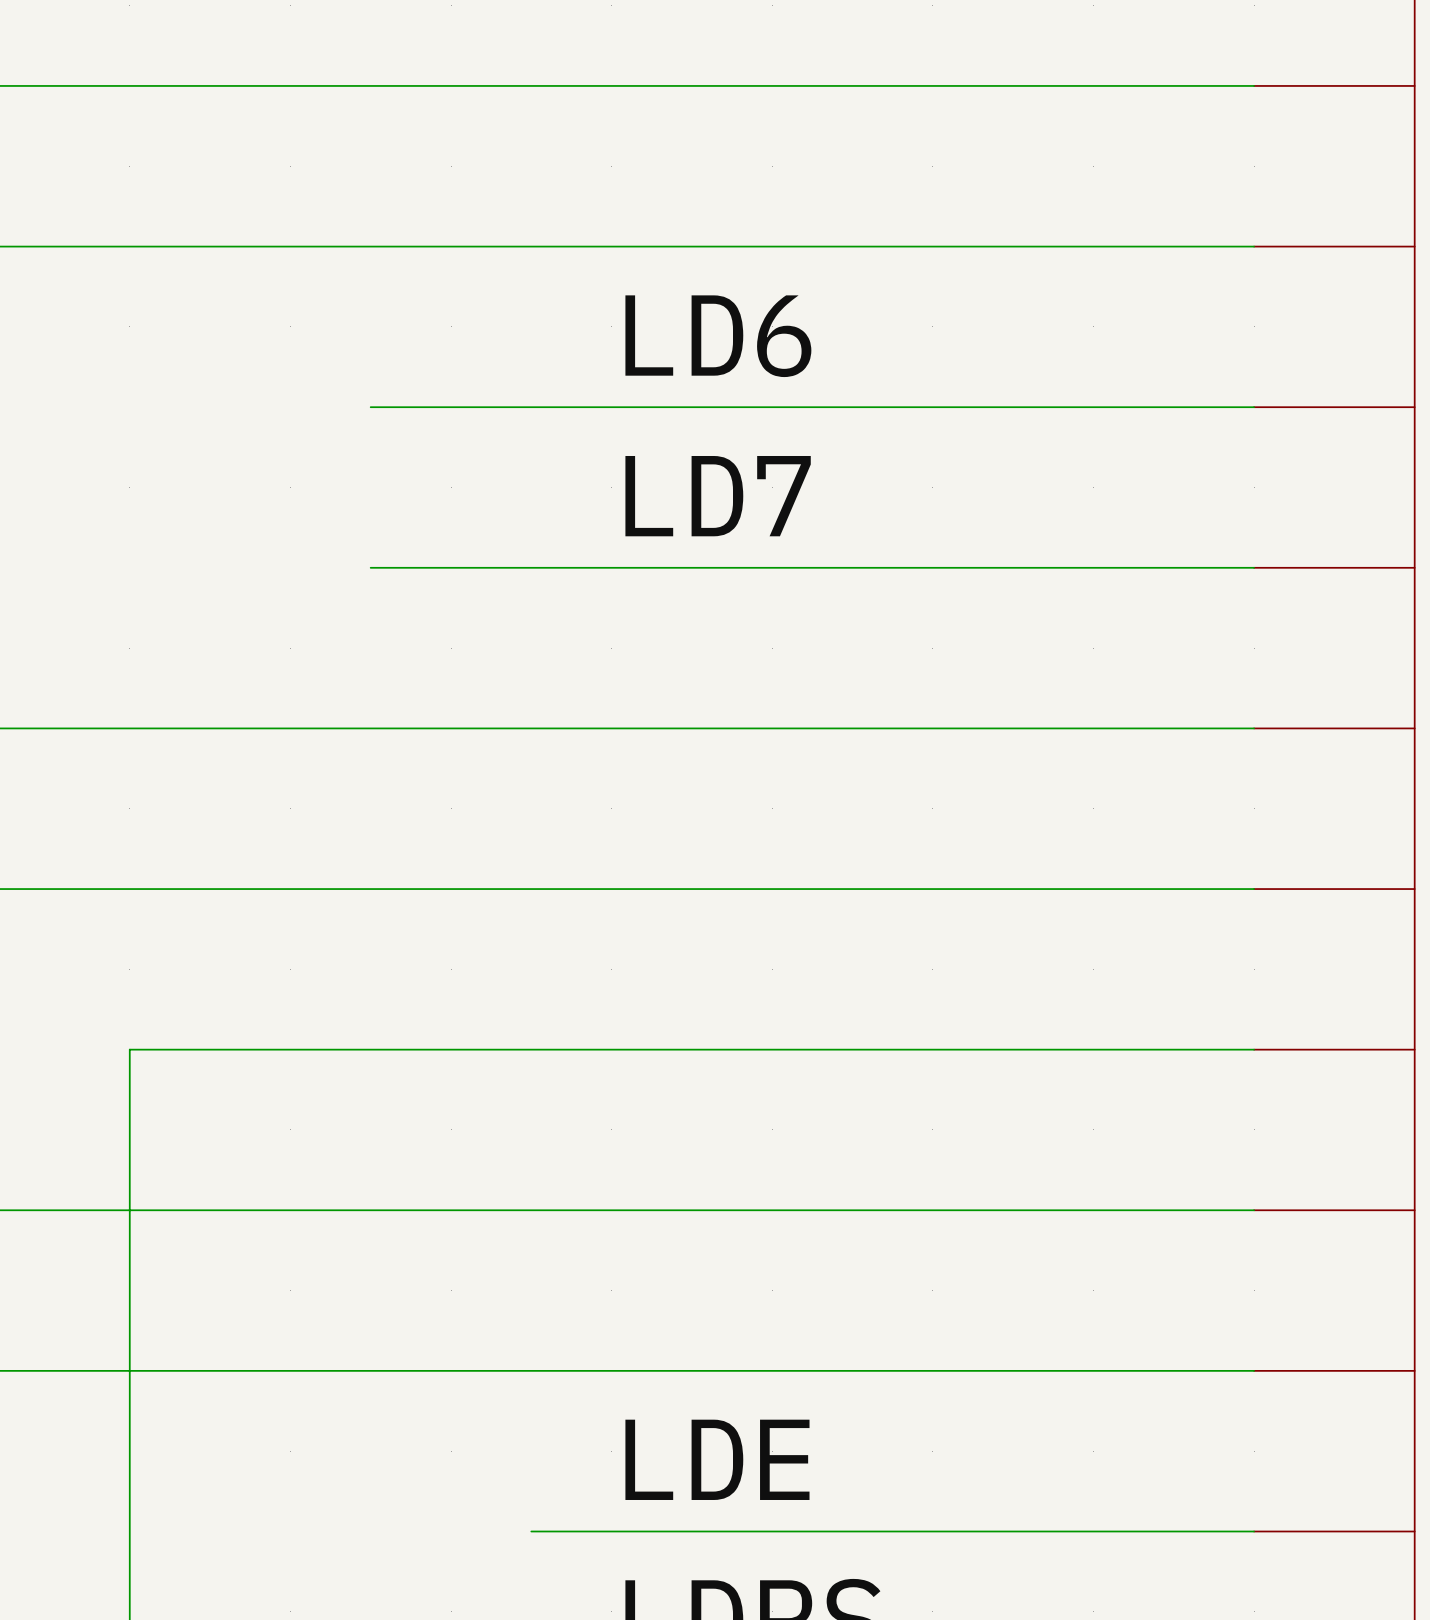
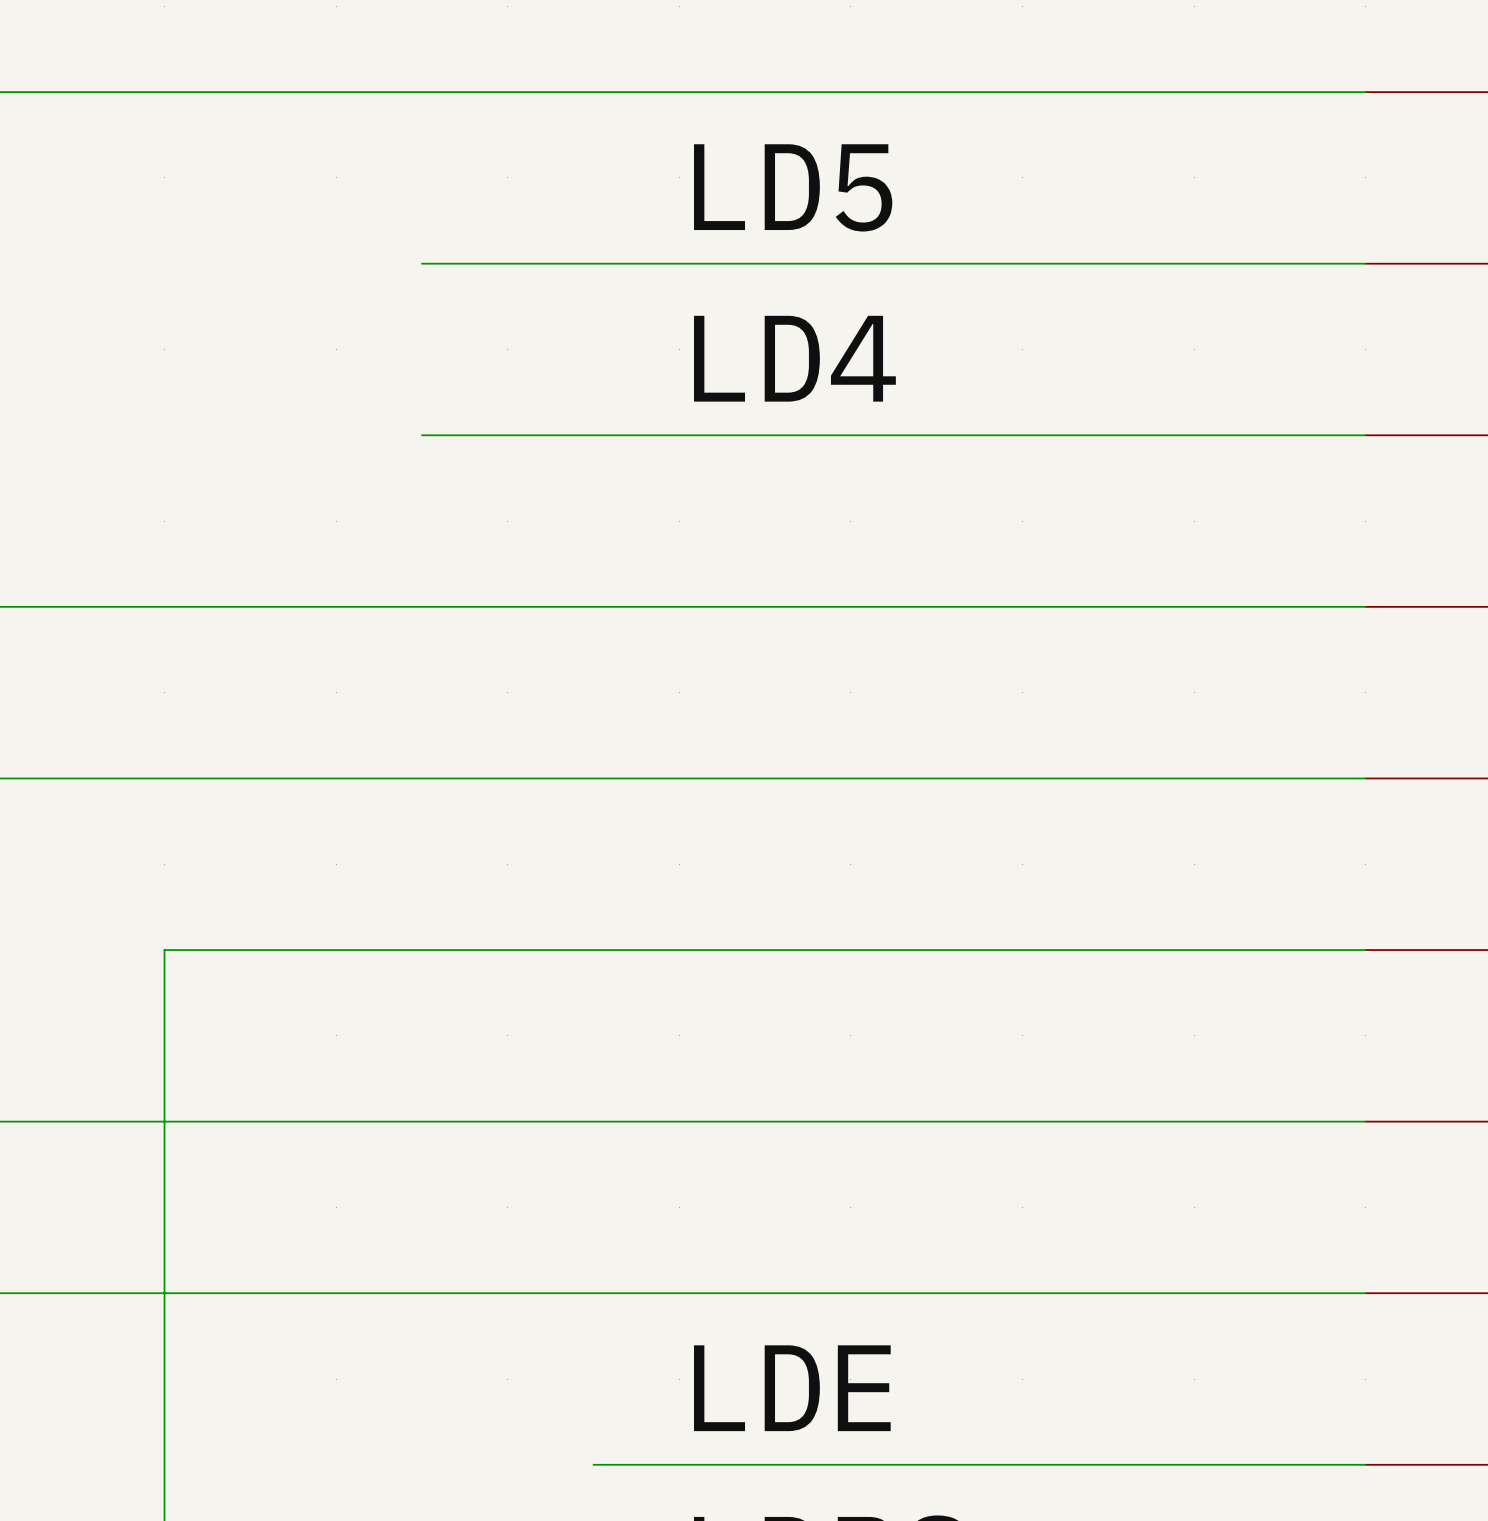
label: LD6 (718, 336) -> LD5 (793, 187)
label: LD7 (718, 496) -> LD4 (794, 358)

